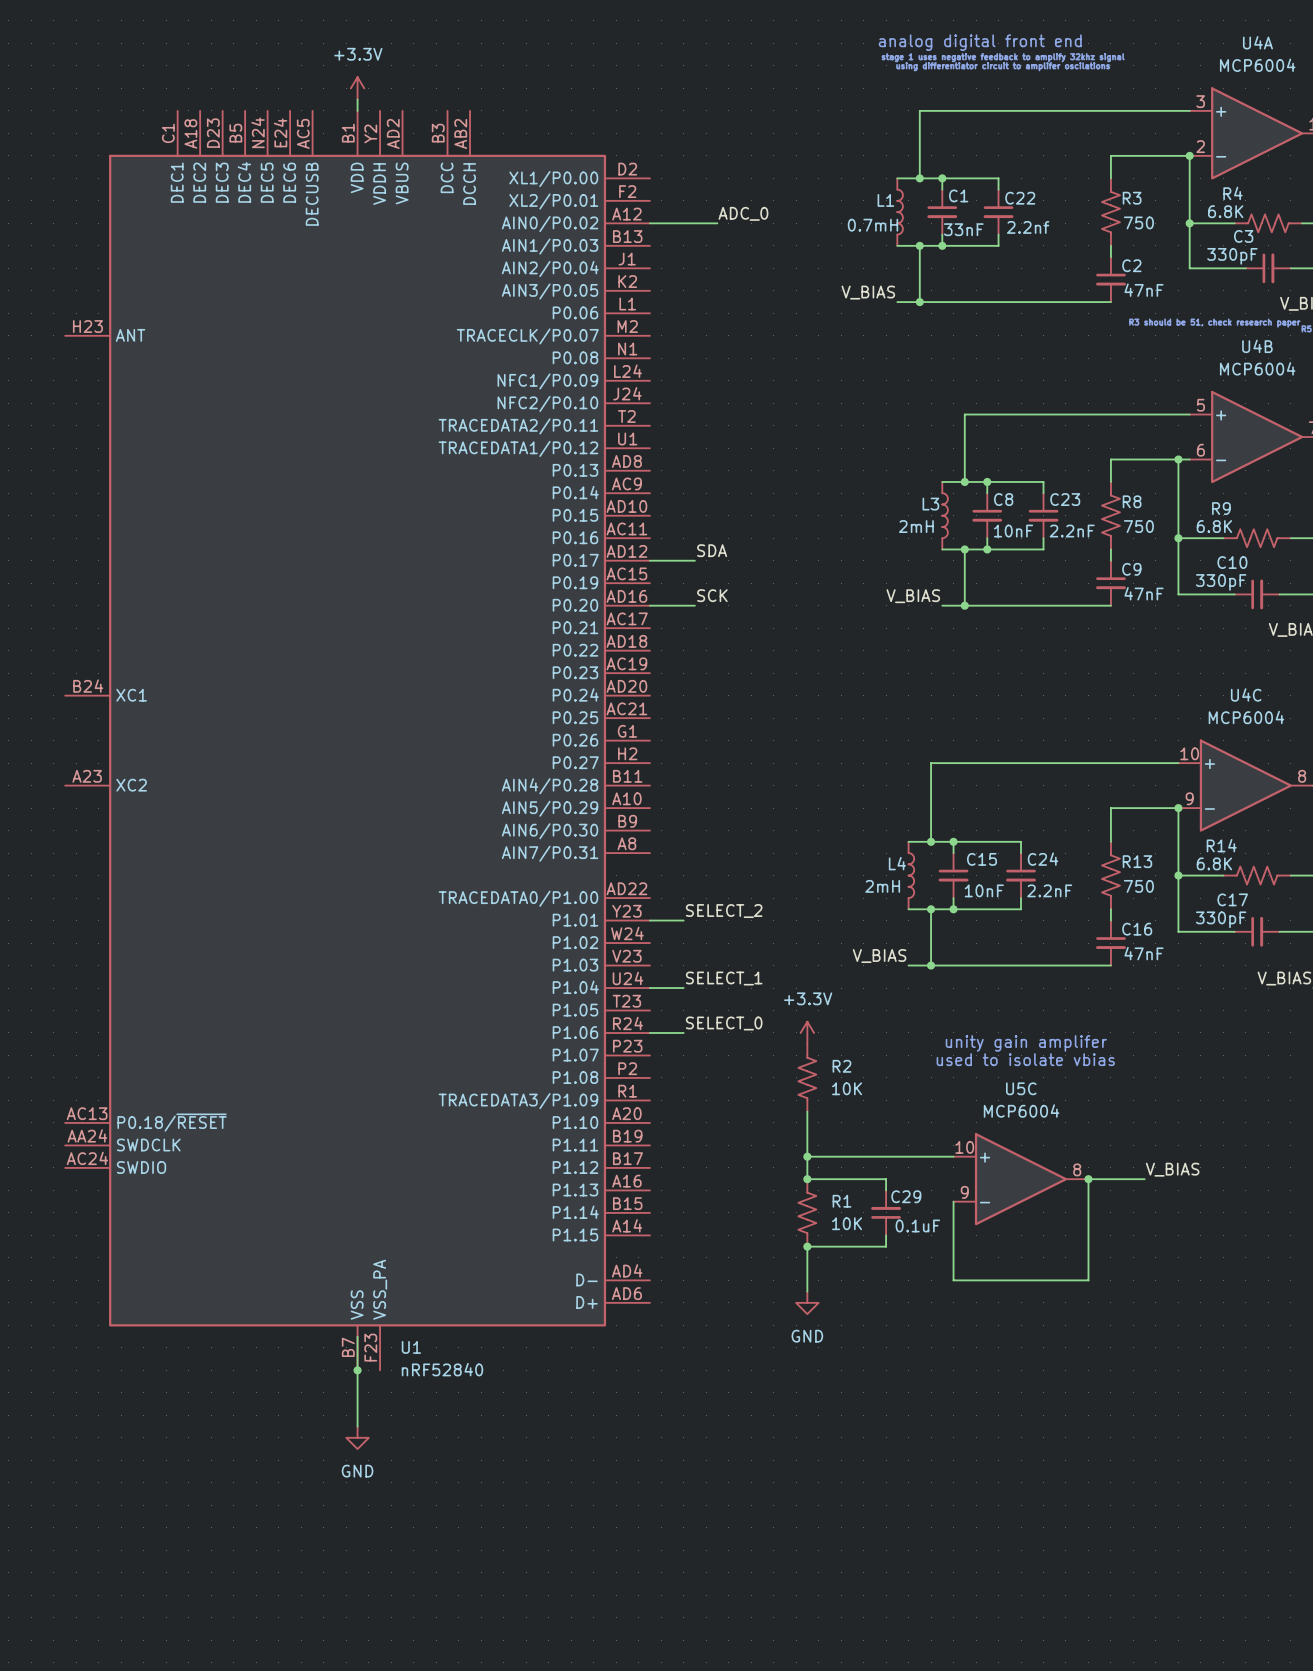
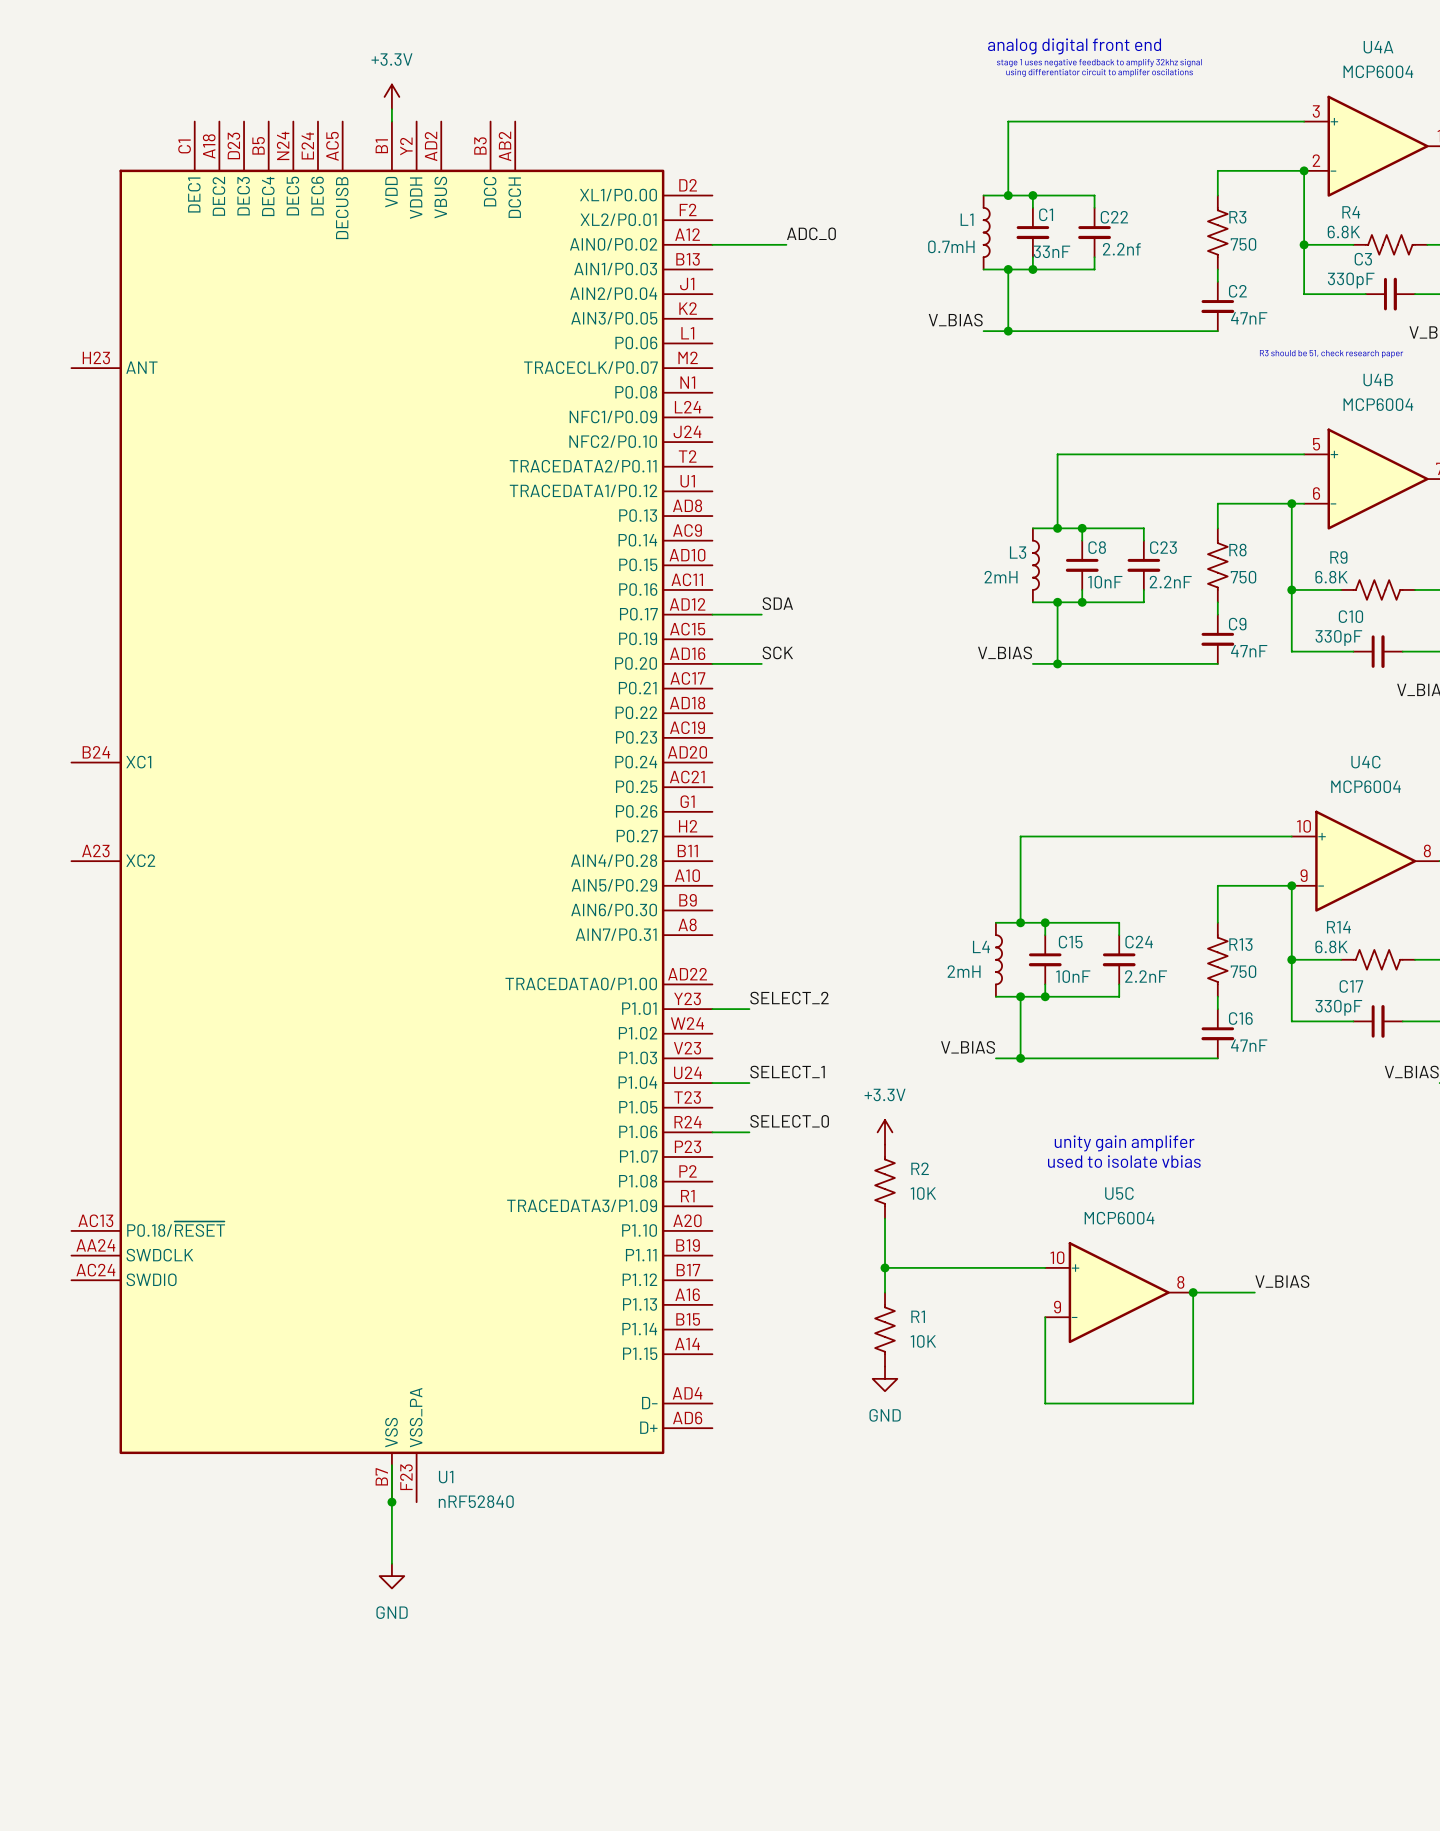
wire: (807, 1179) (886, 1179) (886, 1190) -> none
junction: (807, 1179) -> none
C29: 0.1uF (886, 1212) -> none
wire: (886, 1235) (886, 1246) (807, 1246) (807, 1291) -> none
junction: (807, 1246) -> none
power symbol position: GND (807, 1302) -> GND (885, 1378)

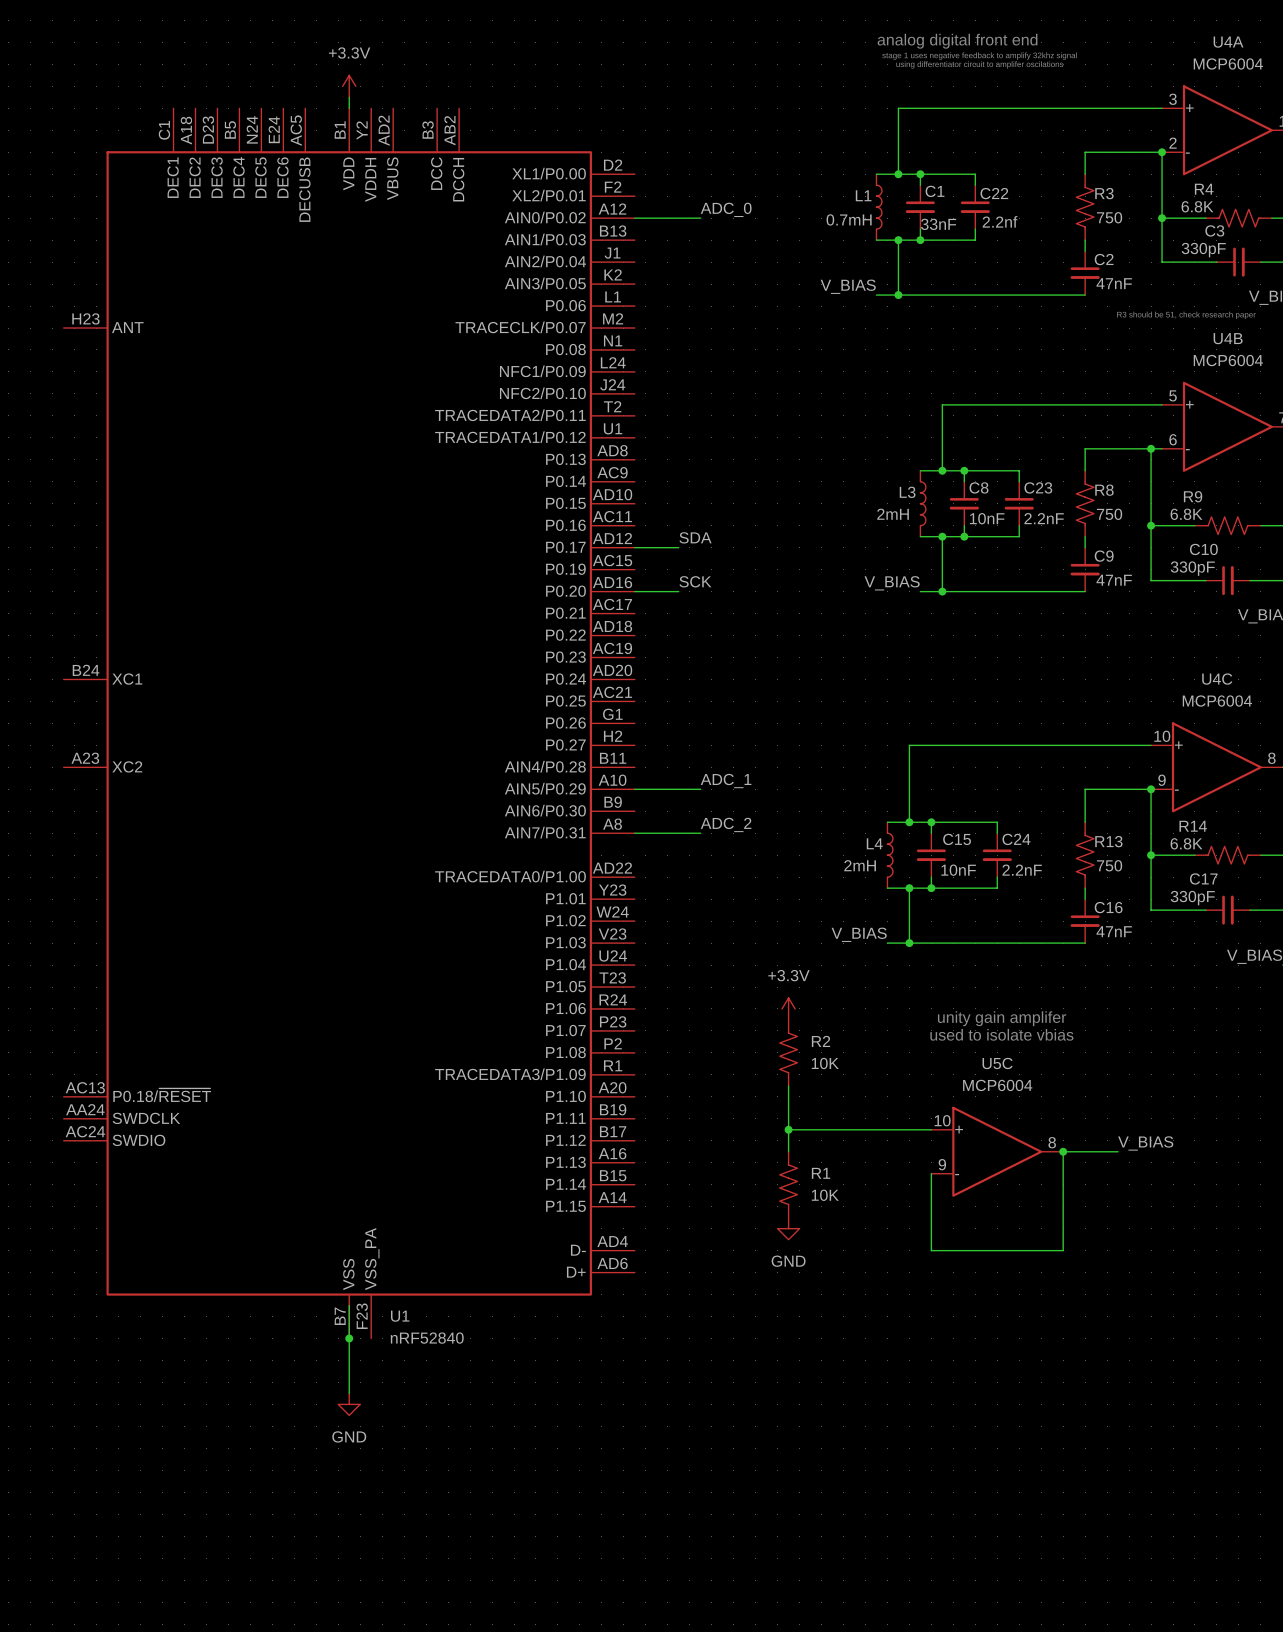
label: none -> ADC_1 (726, 781)
wire: none -> (634, 789) (700, 789)
label: none -> ADC_2 (726, 824)
wire: none -> (634, 833) (700, 833)
label: SELECT_2 (789, 998) -> none
wire: (712, 1009) (749, 1009) -> none
label: SELECT_1 (787, 1072) -> none
wire: (712, 1083) (749, 1083) -> none
label: SELECT_0 (789, 1121) -> none
wire: (712, 1132) (749, 1132) -> none

